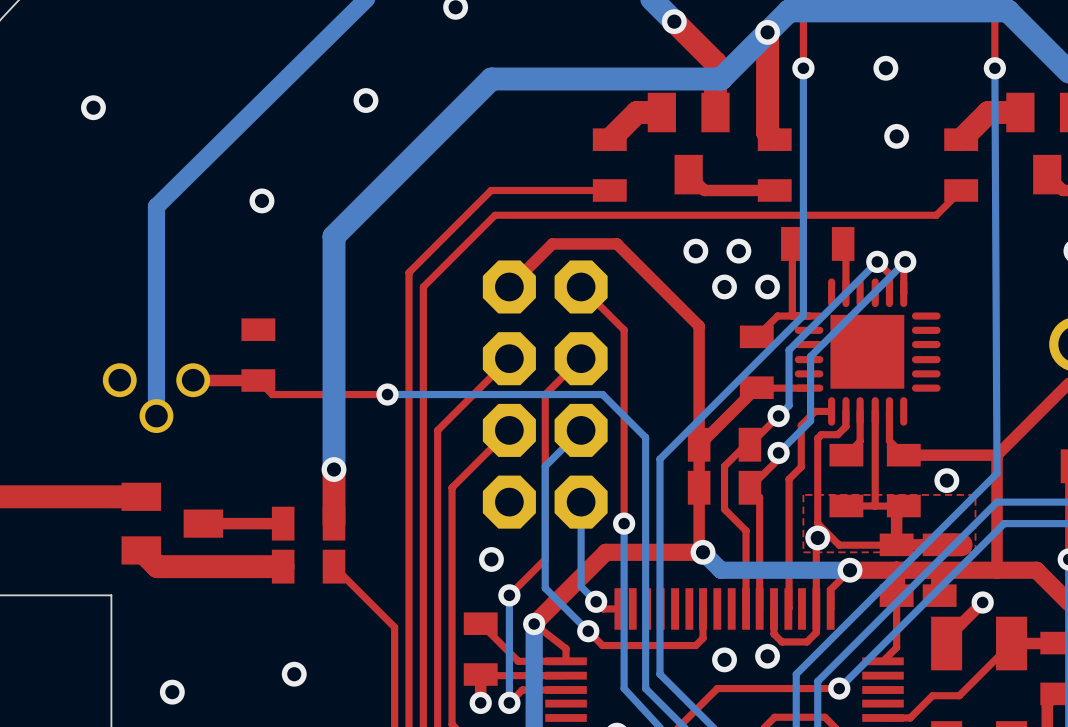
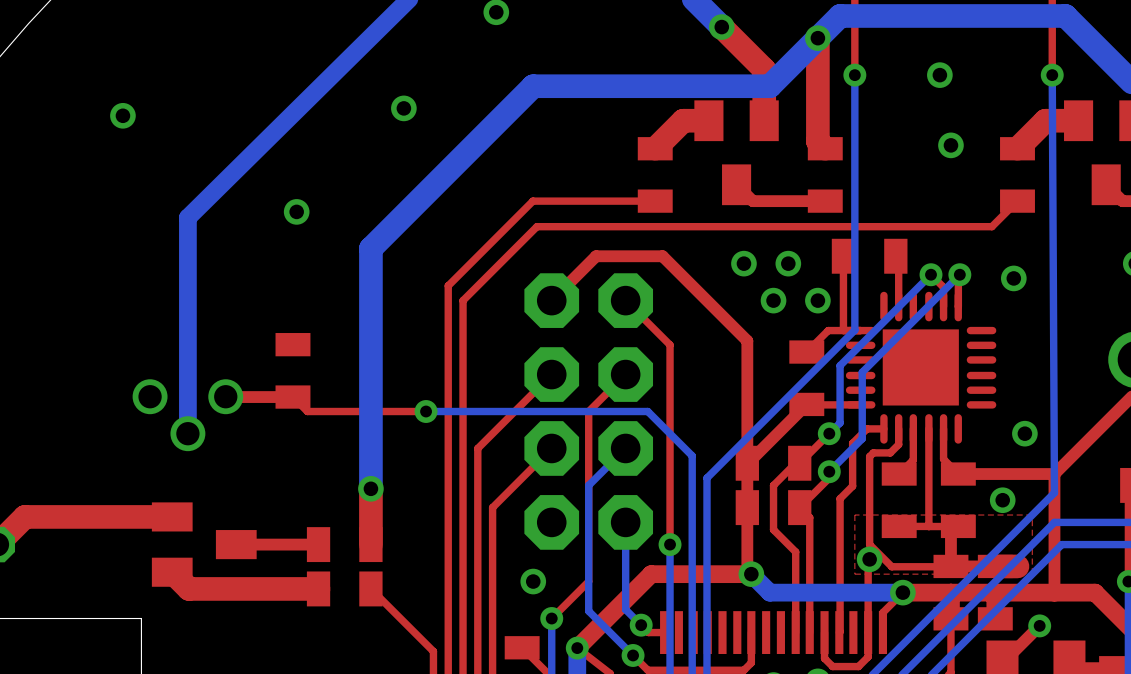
via: none -> (1013, 278)
via: none -> (1024, 433)

